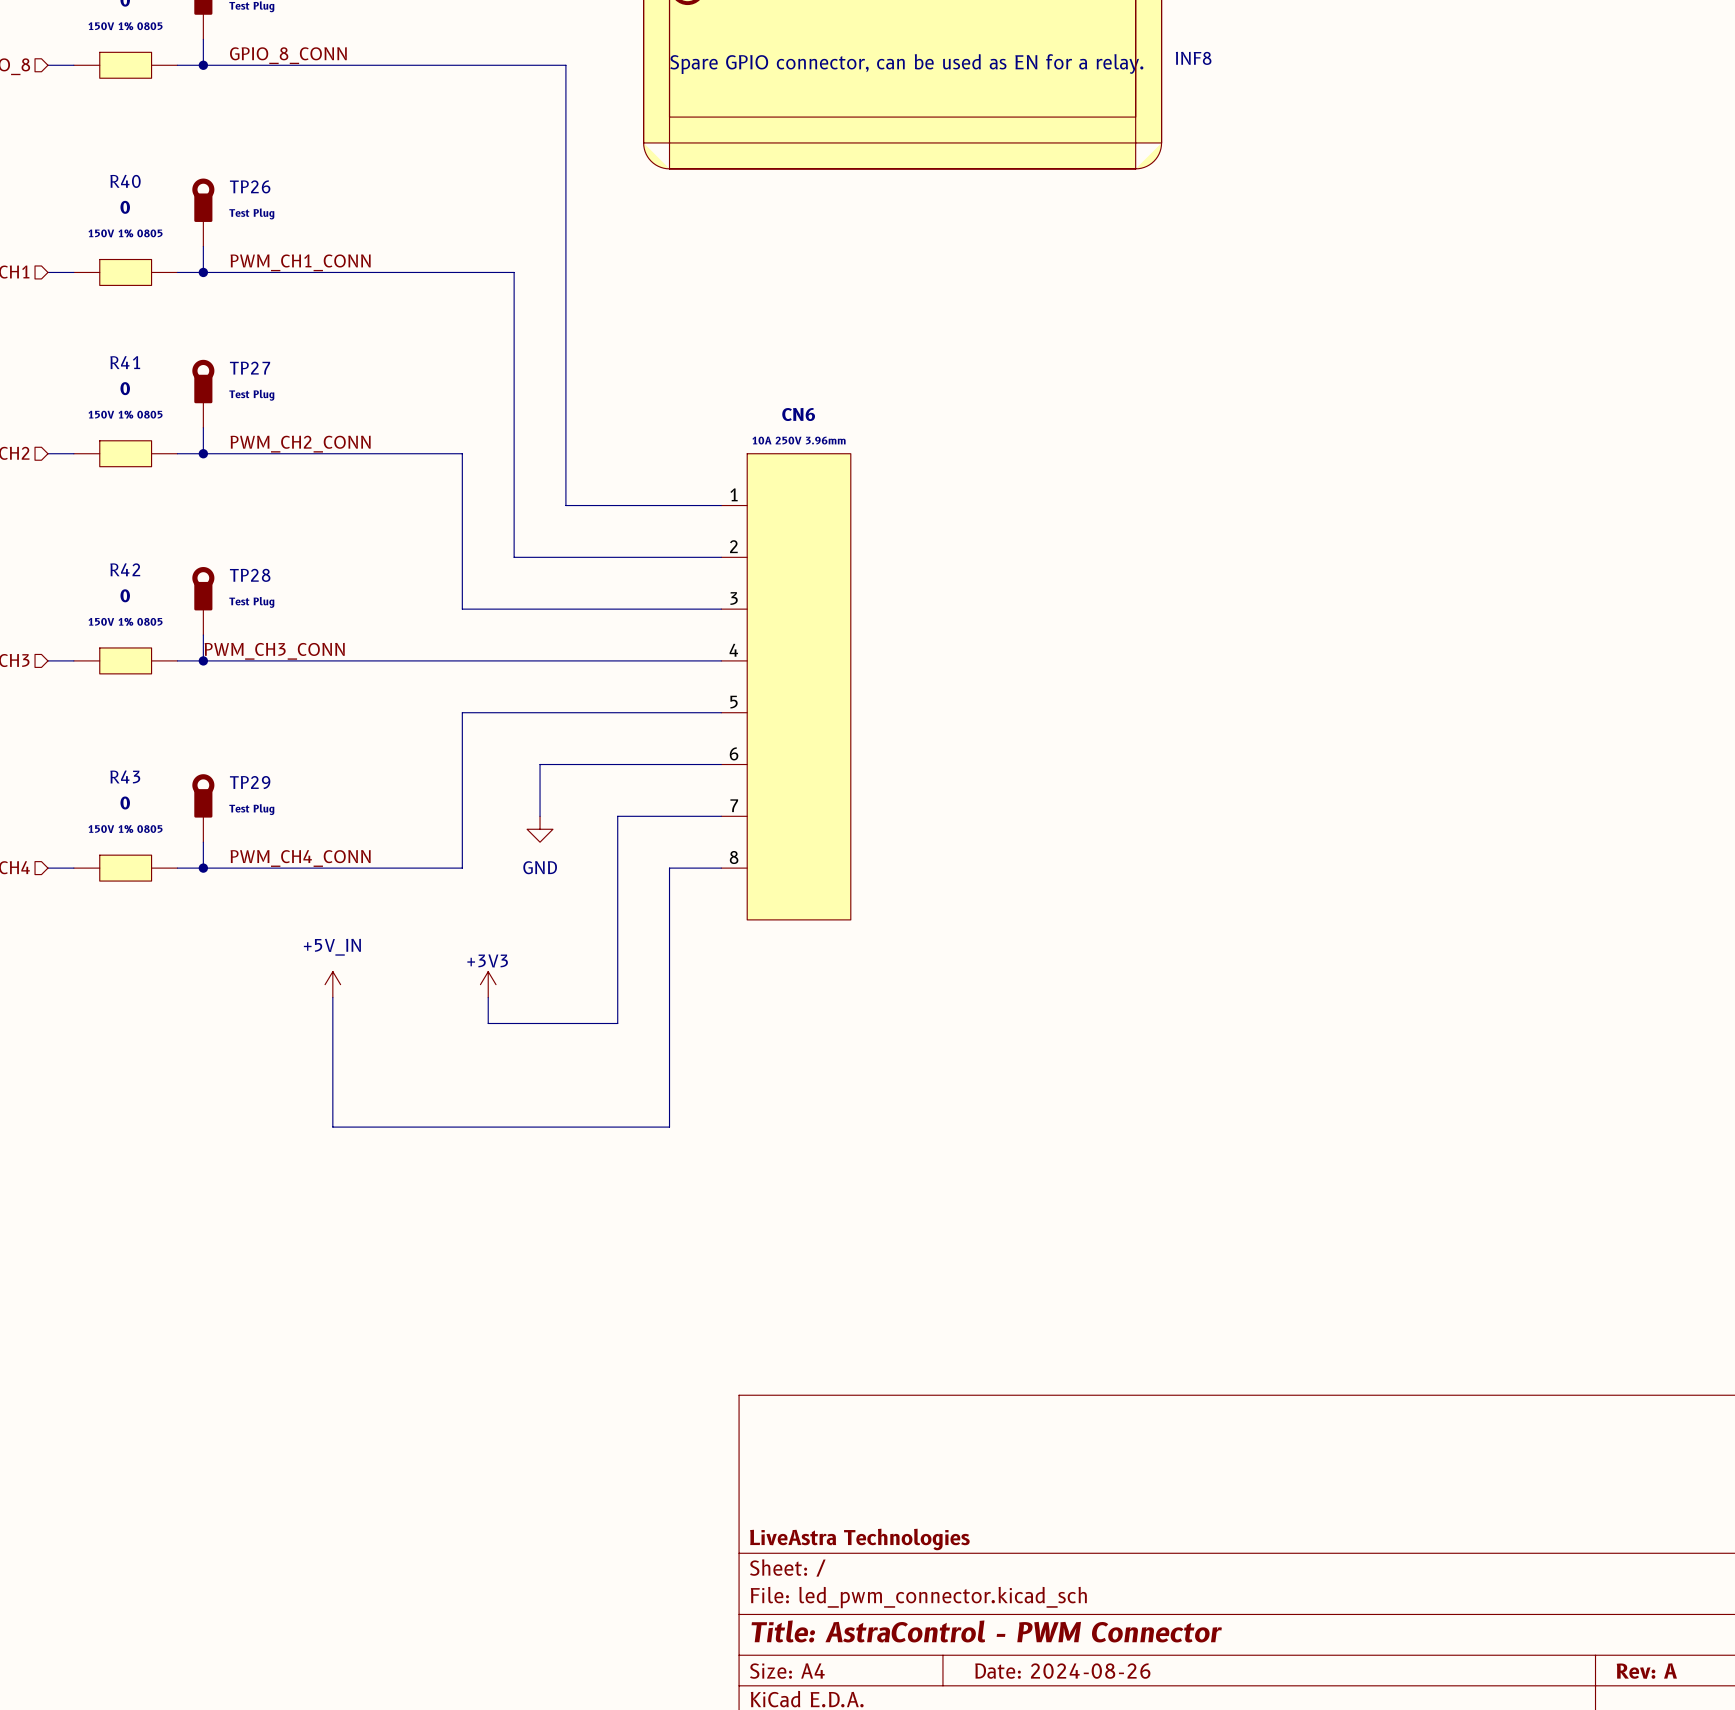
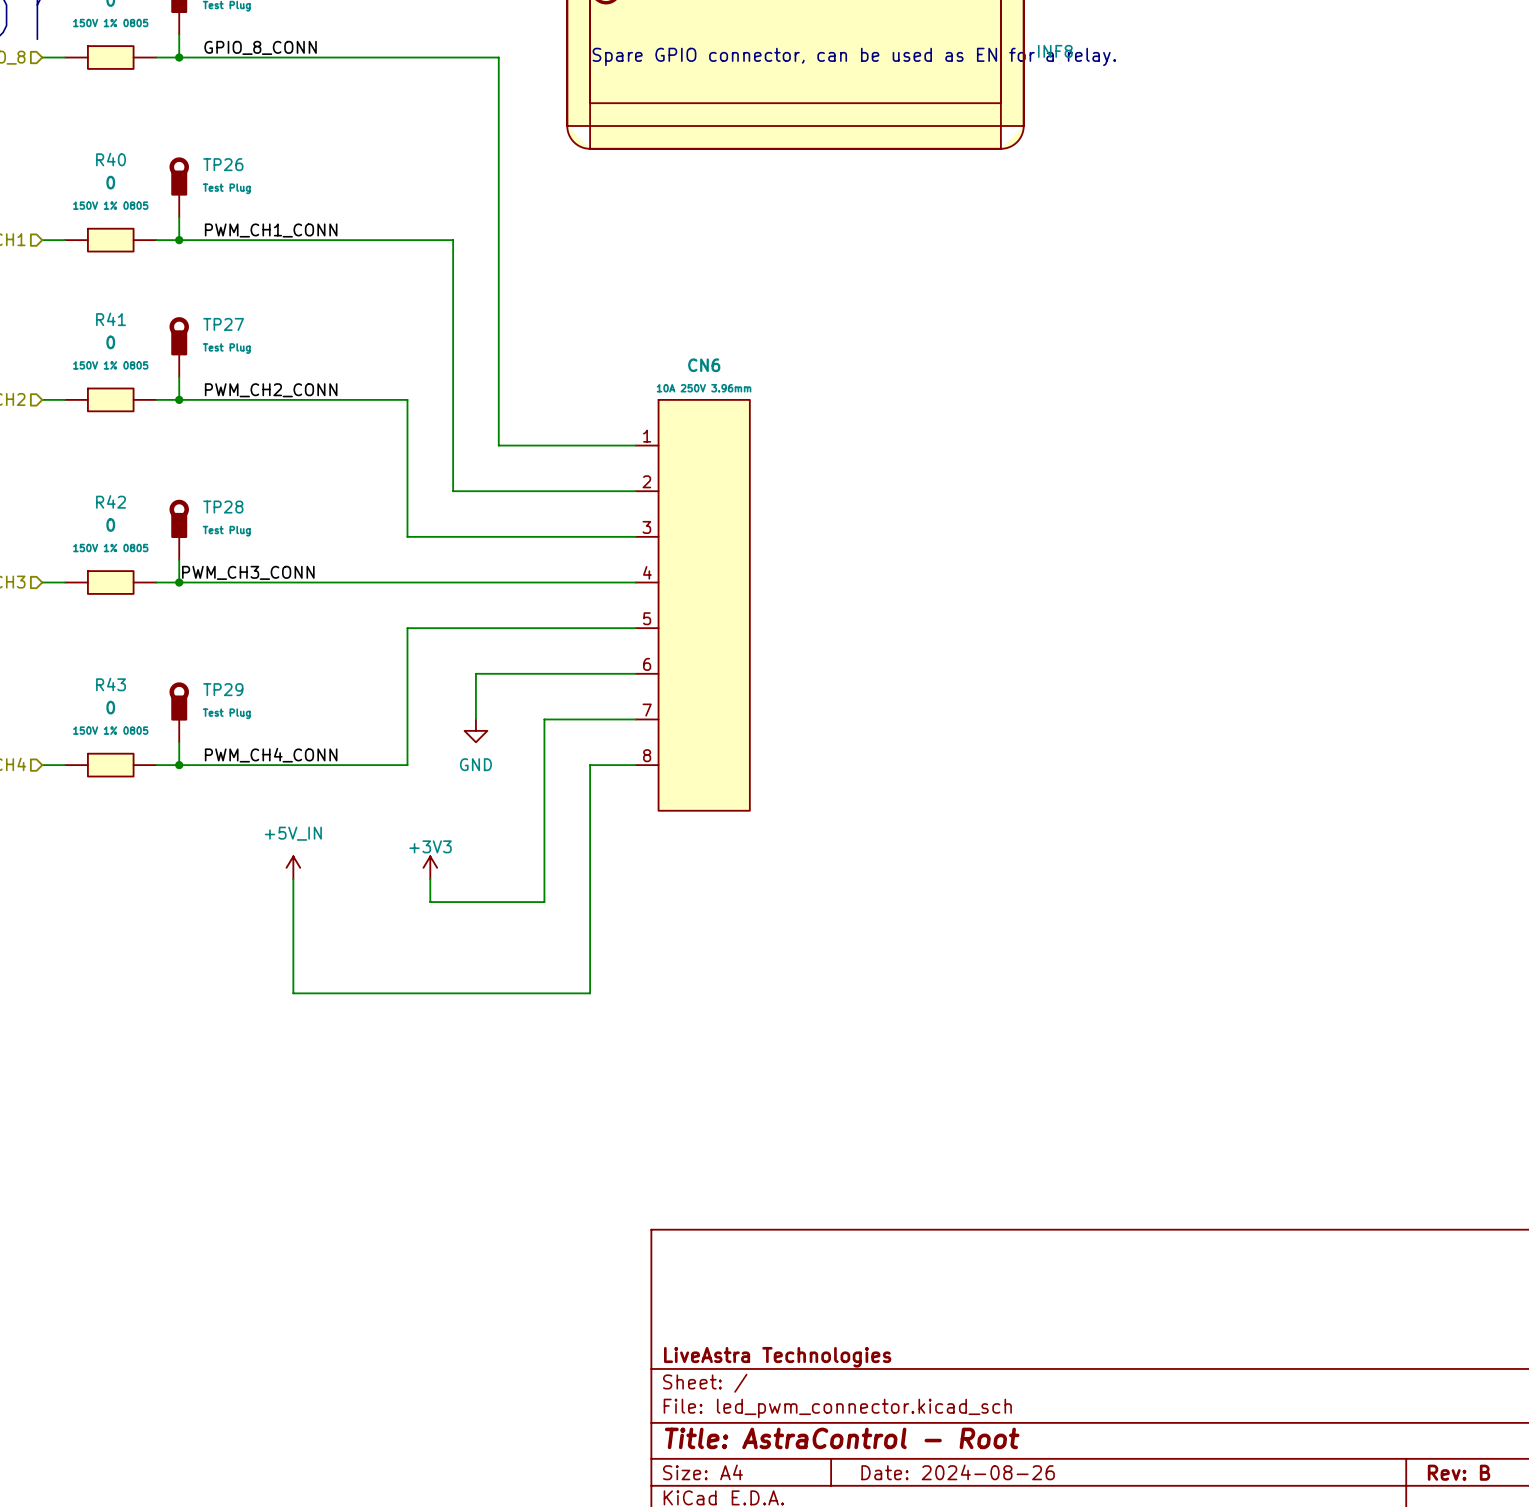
title block: Title: AstraControl - PWM Connector (986, 1631) -> Title: AstraControl - Root (842, 1438)
title block: Rev: A (1646, 1671) -> Rev: B (1459, 1472)

